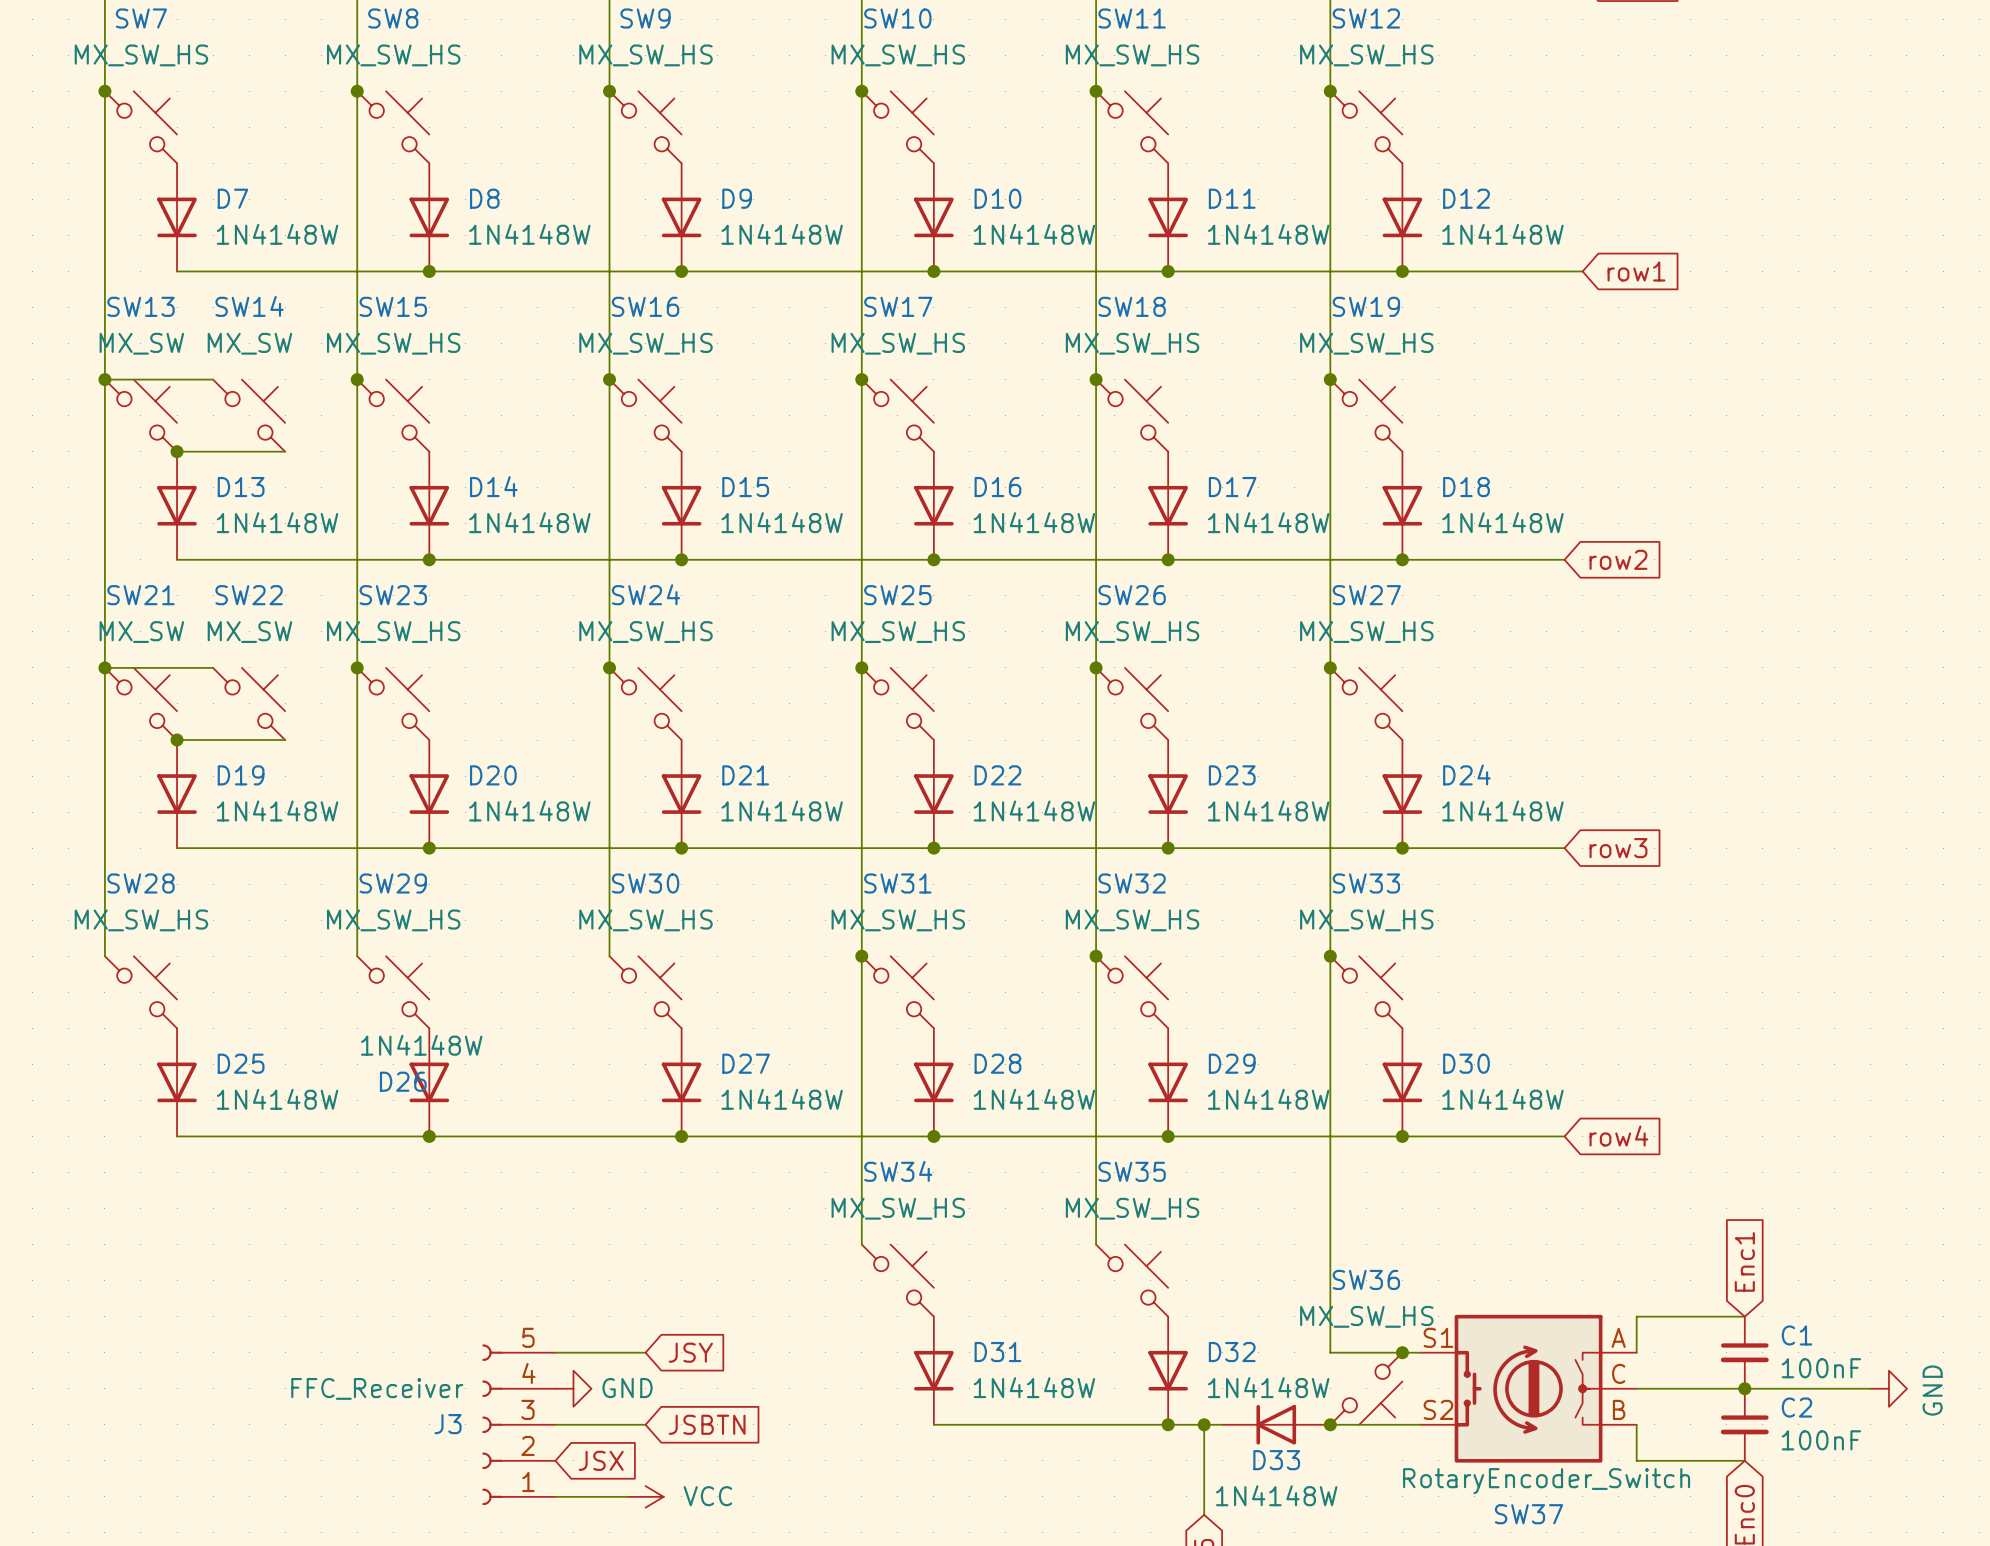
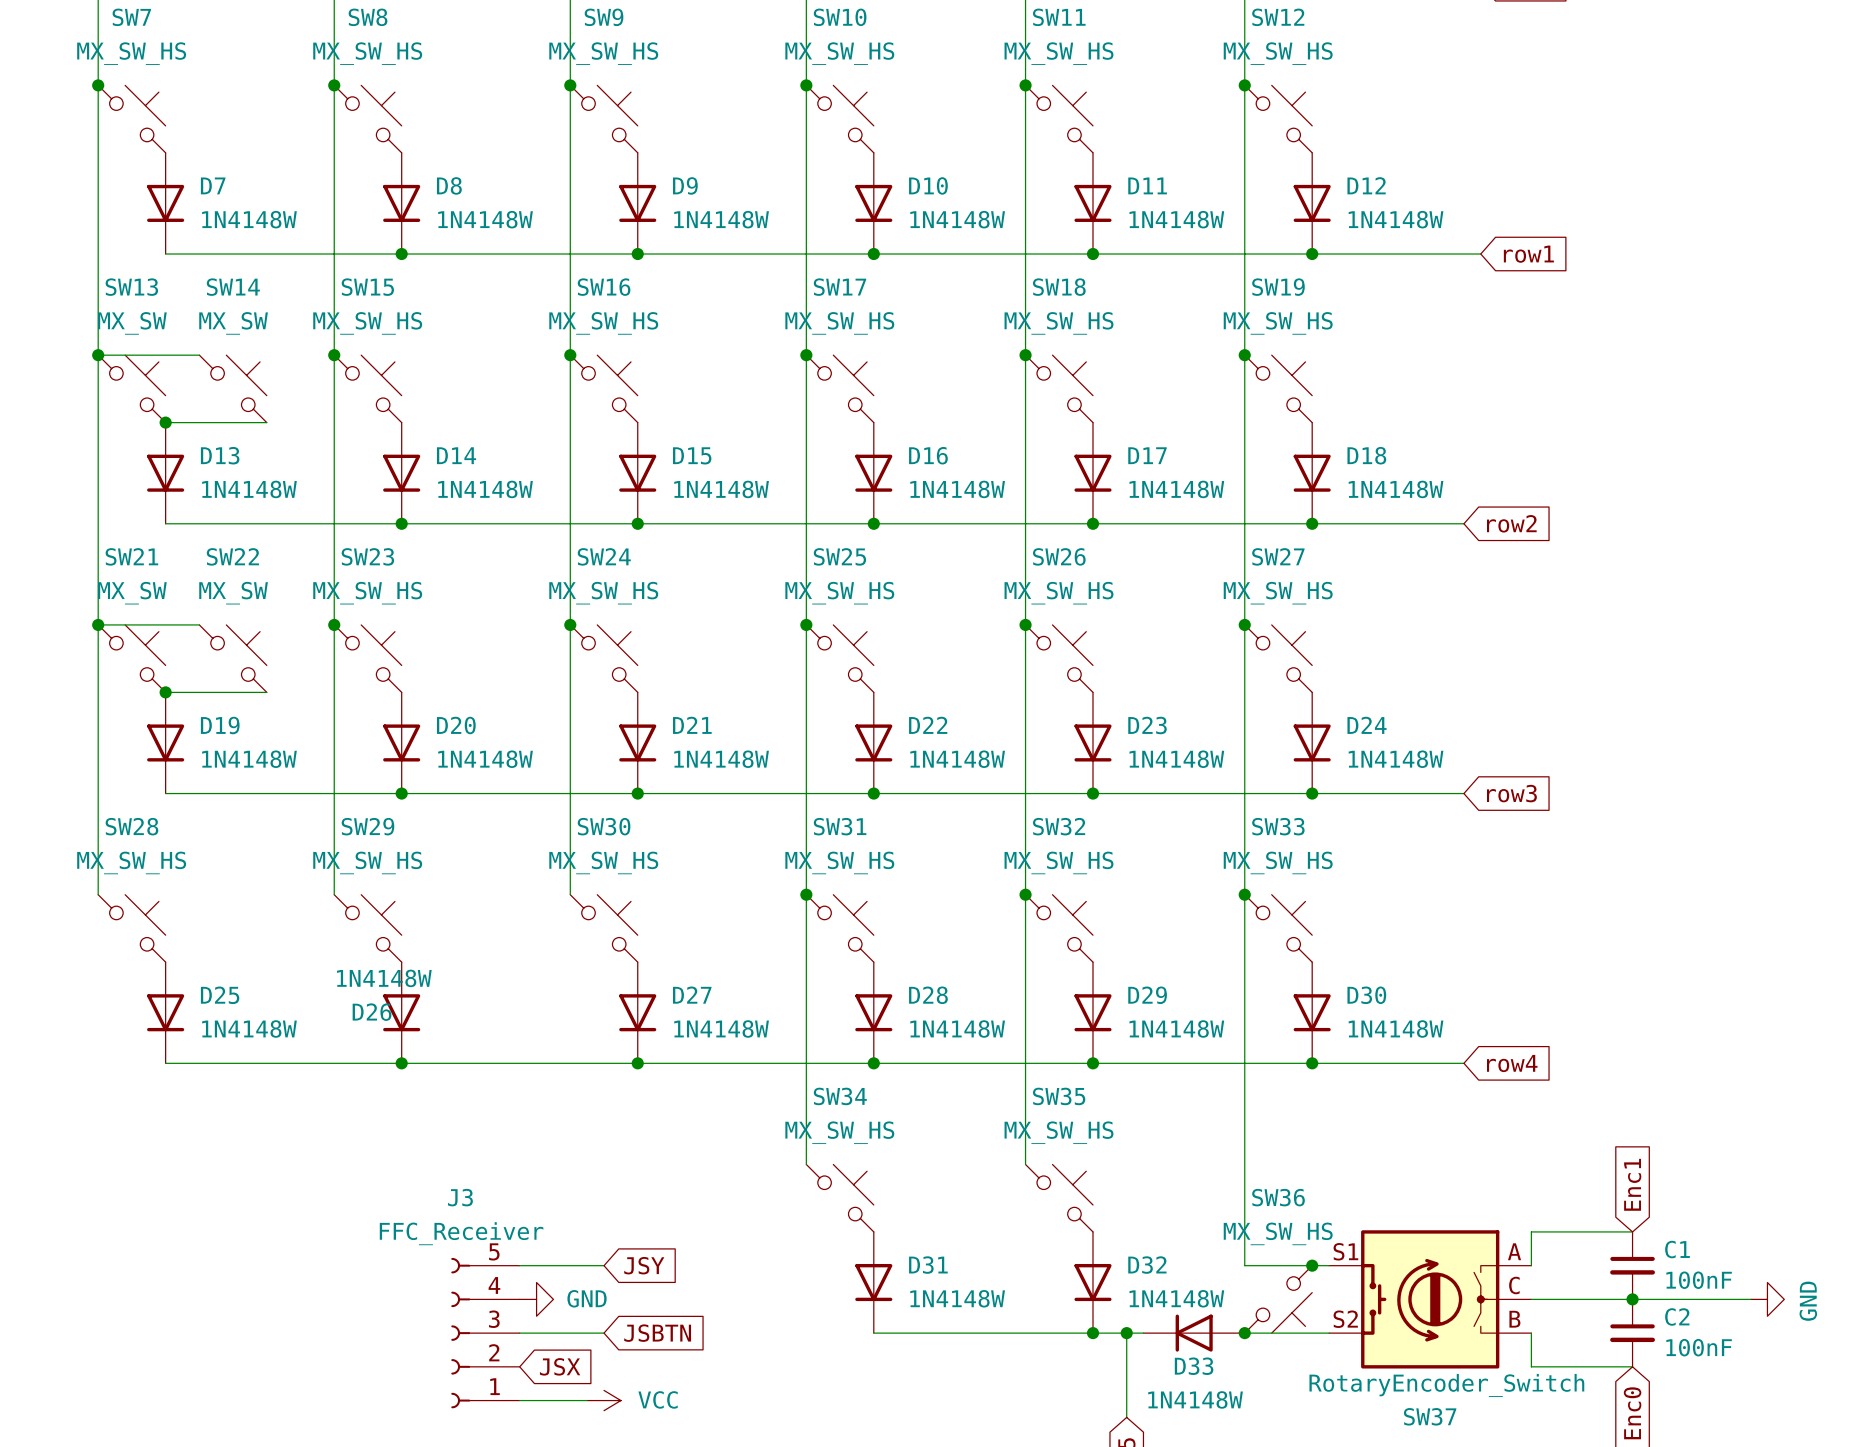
J3 value position: FFC_Receiver (377, 1388) -> FFC_Receiver (461, 1233)
J3 name position: J3 (448, 1424) -> J3 (460, 1197)

